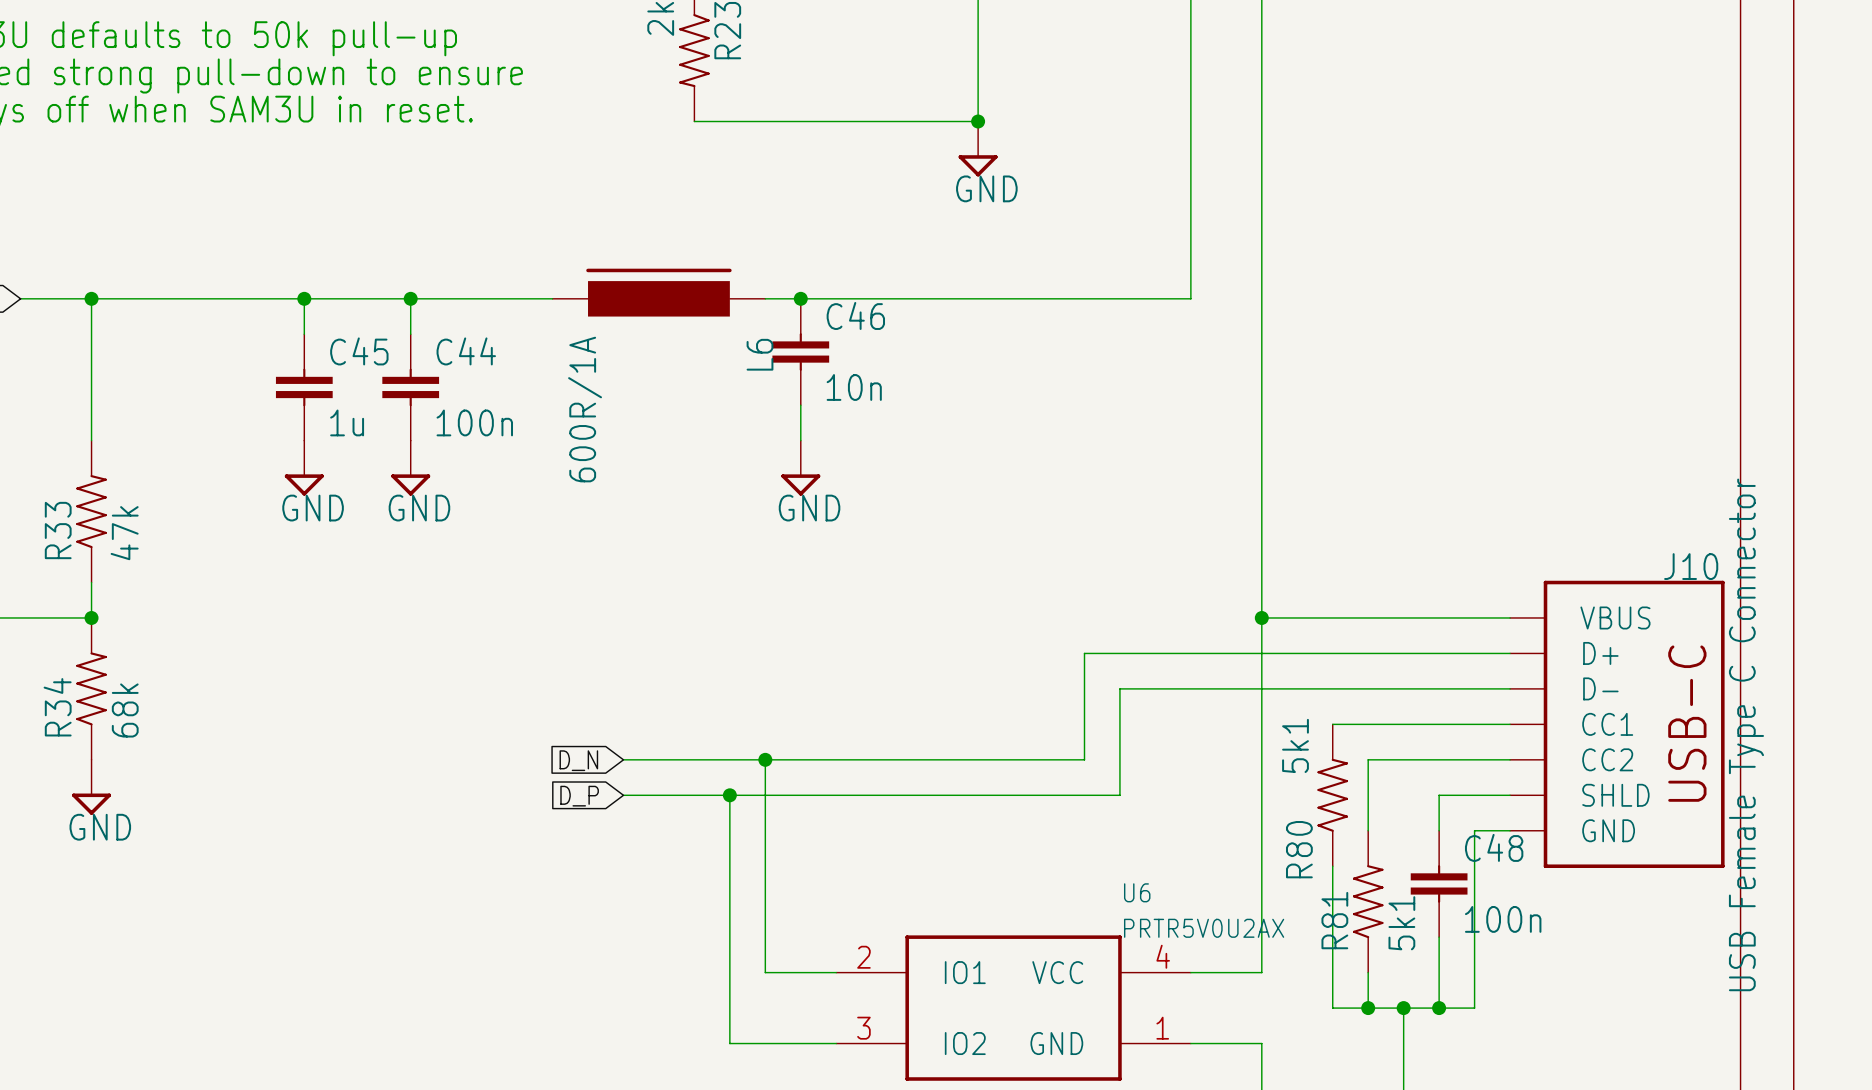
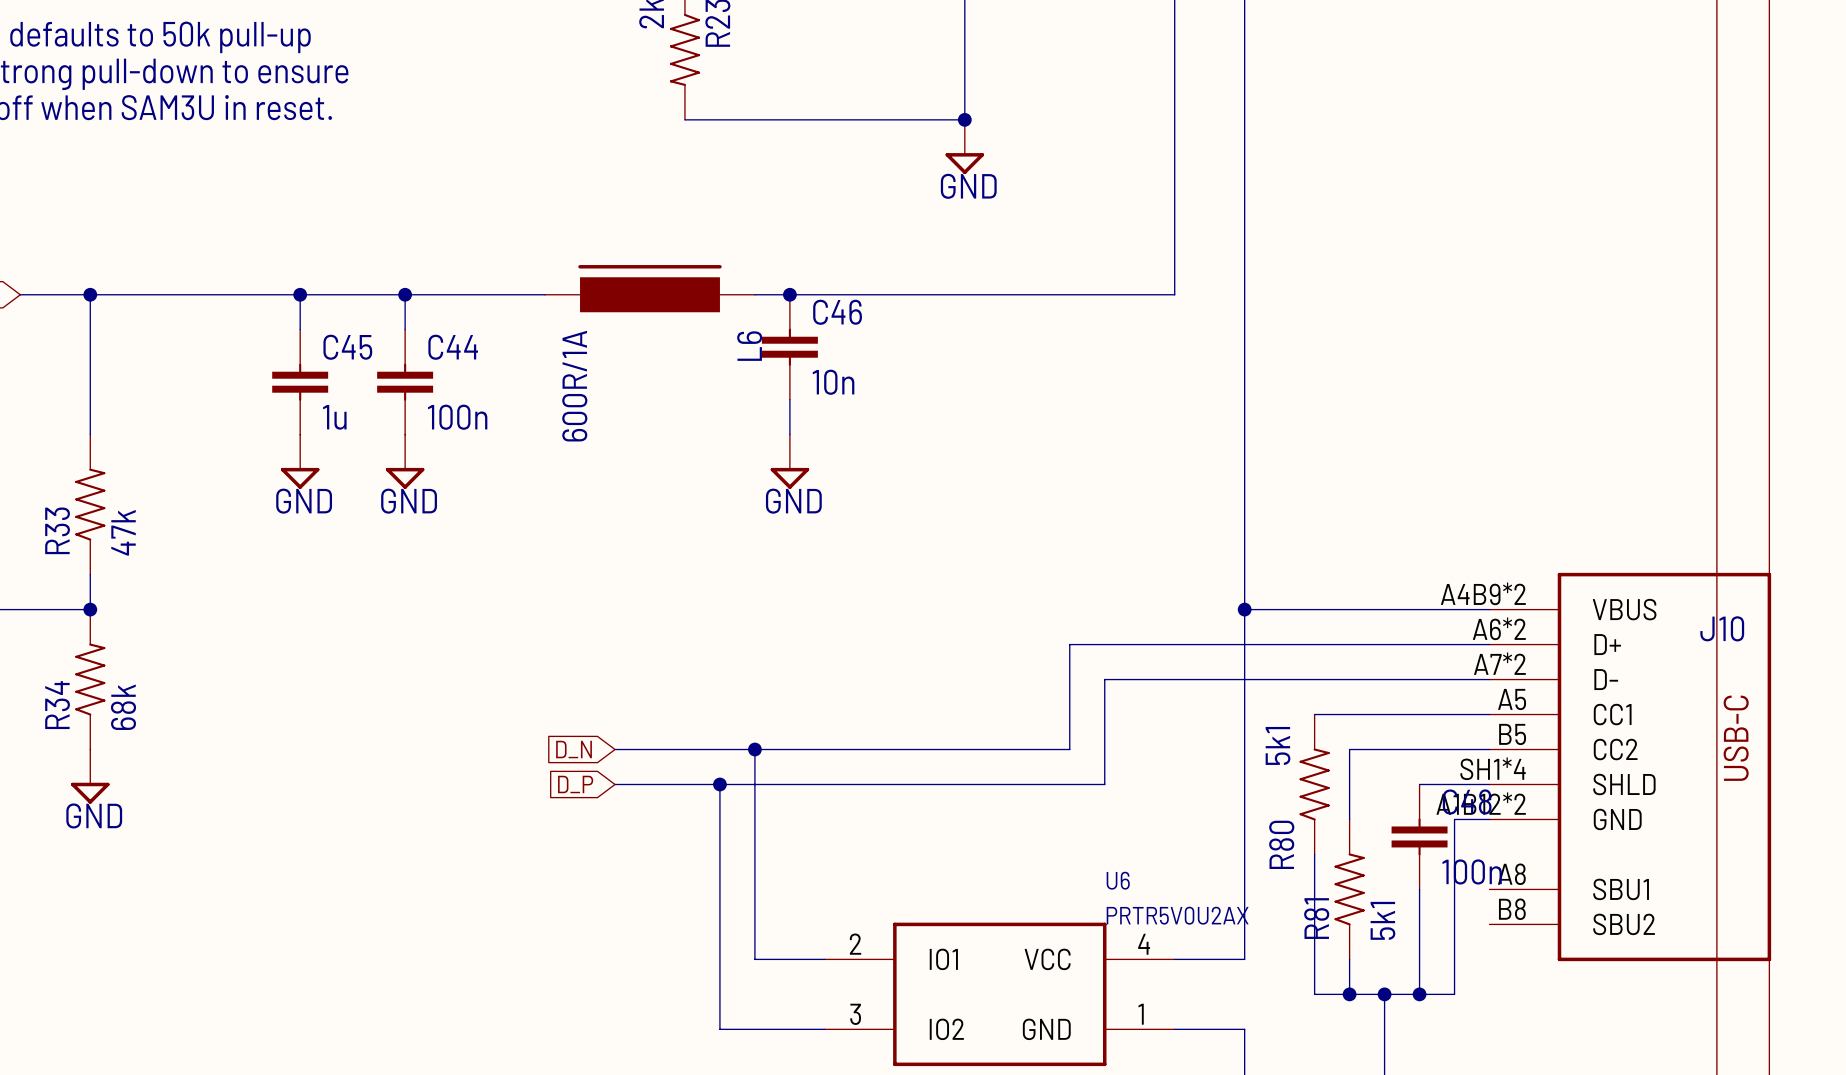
J10 name position: J10 (1691, 566) -> J10 (1722, 628)
J10 symbol: [1510, 580, 1725, 868] -> [1489, 572, 1772, 962]
J10 value: USB Female Type C Connector (1746, 734) -> none
C48 position: (1439, 883) -> (1419, 836)

